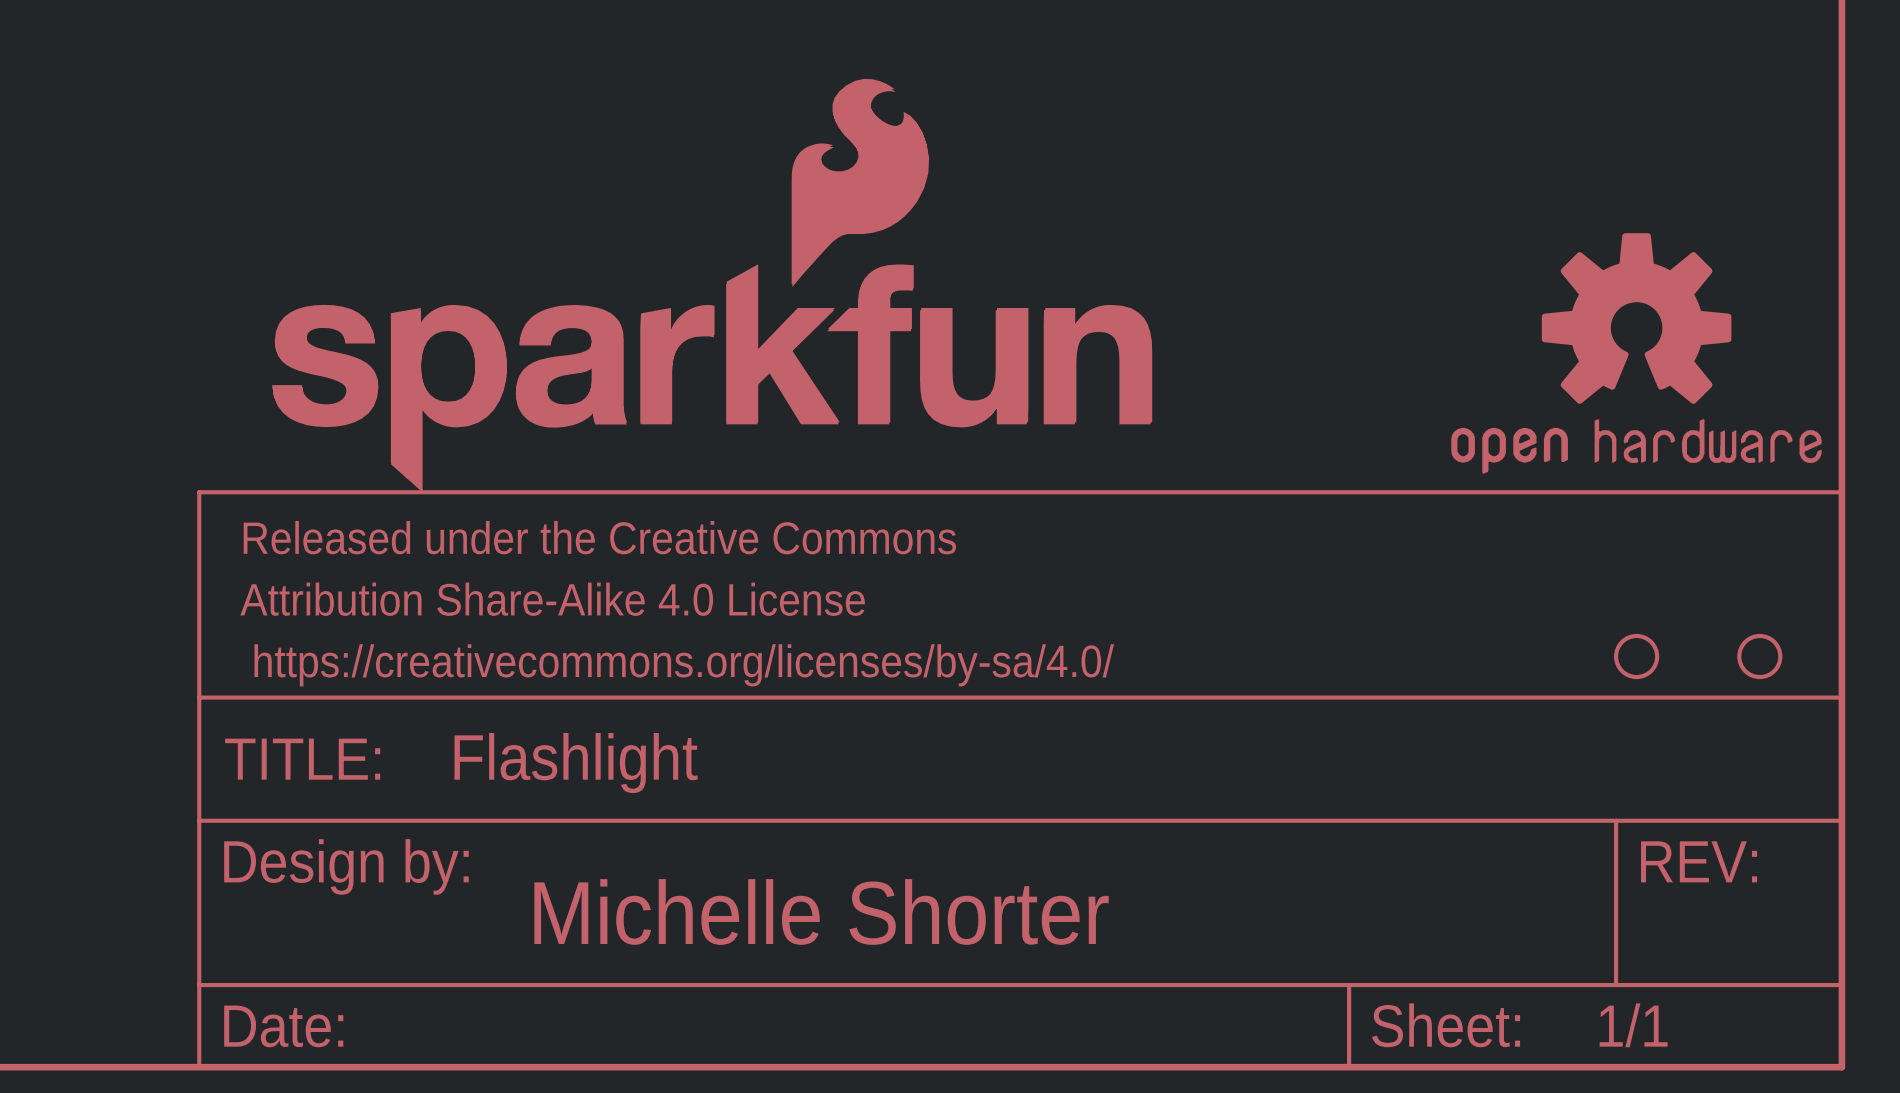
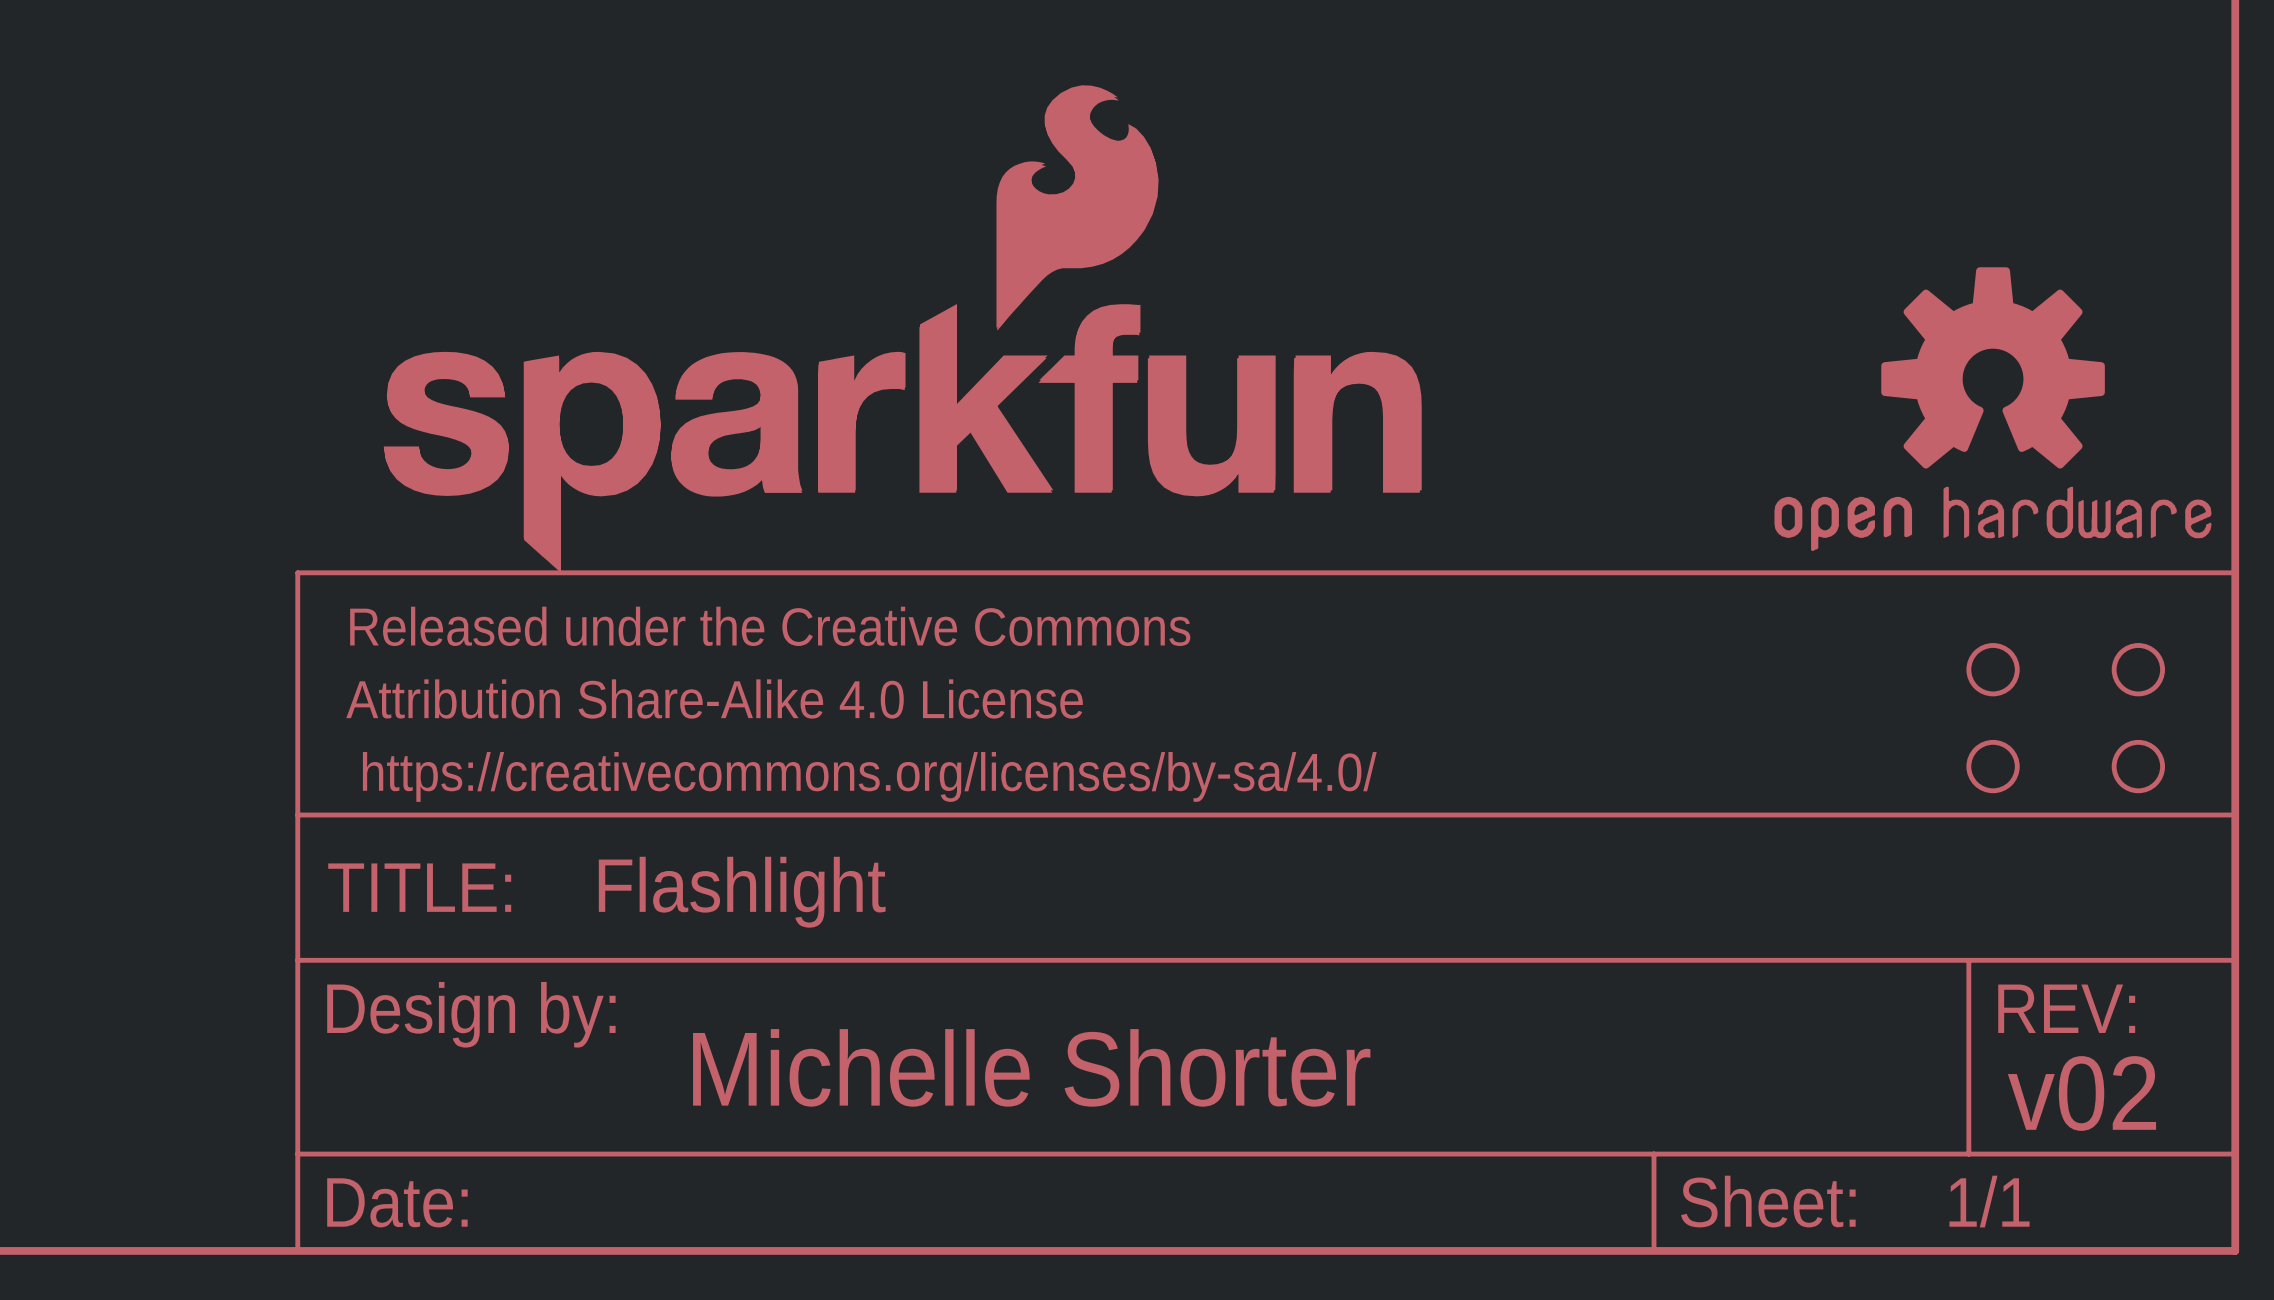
part: none -> (1993, 669)
part: none -> (2138, 669)
text: none -> v02 (2081, 1093)

